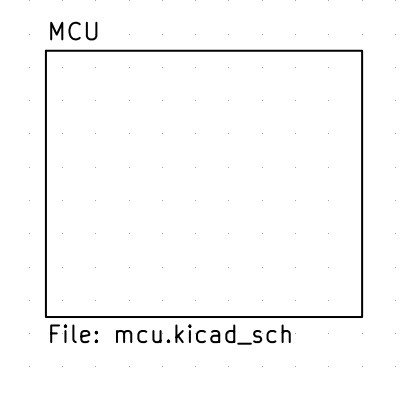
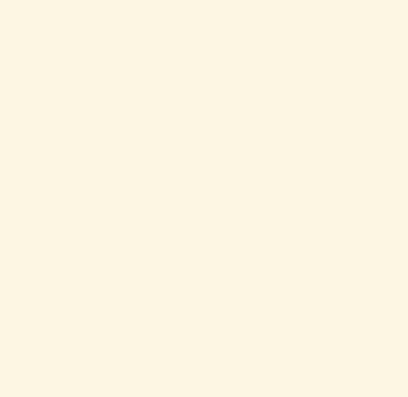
sheet MCU: File: mcu.kicad_sch (204, 183) -> none

